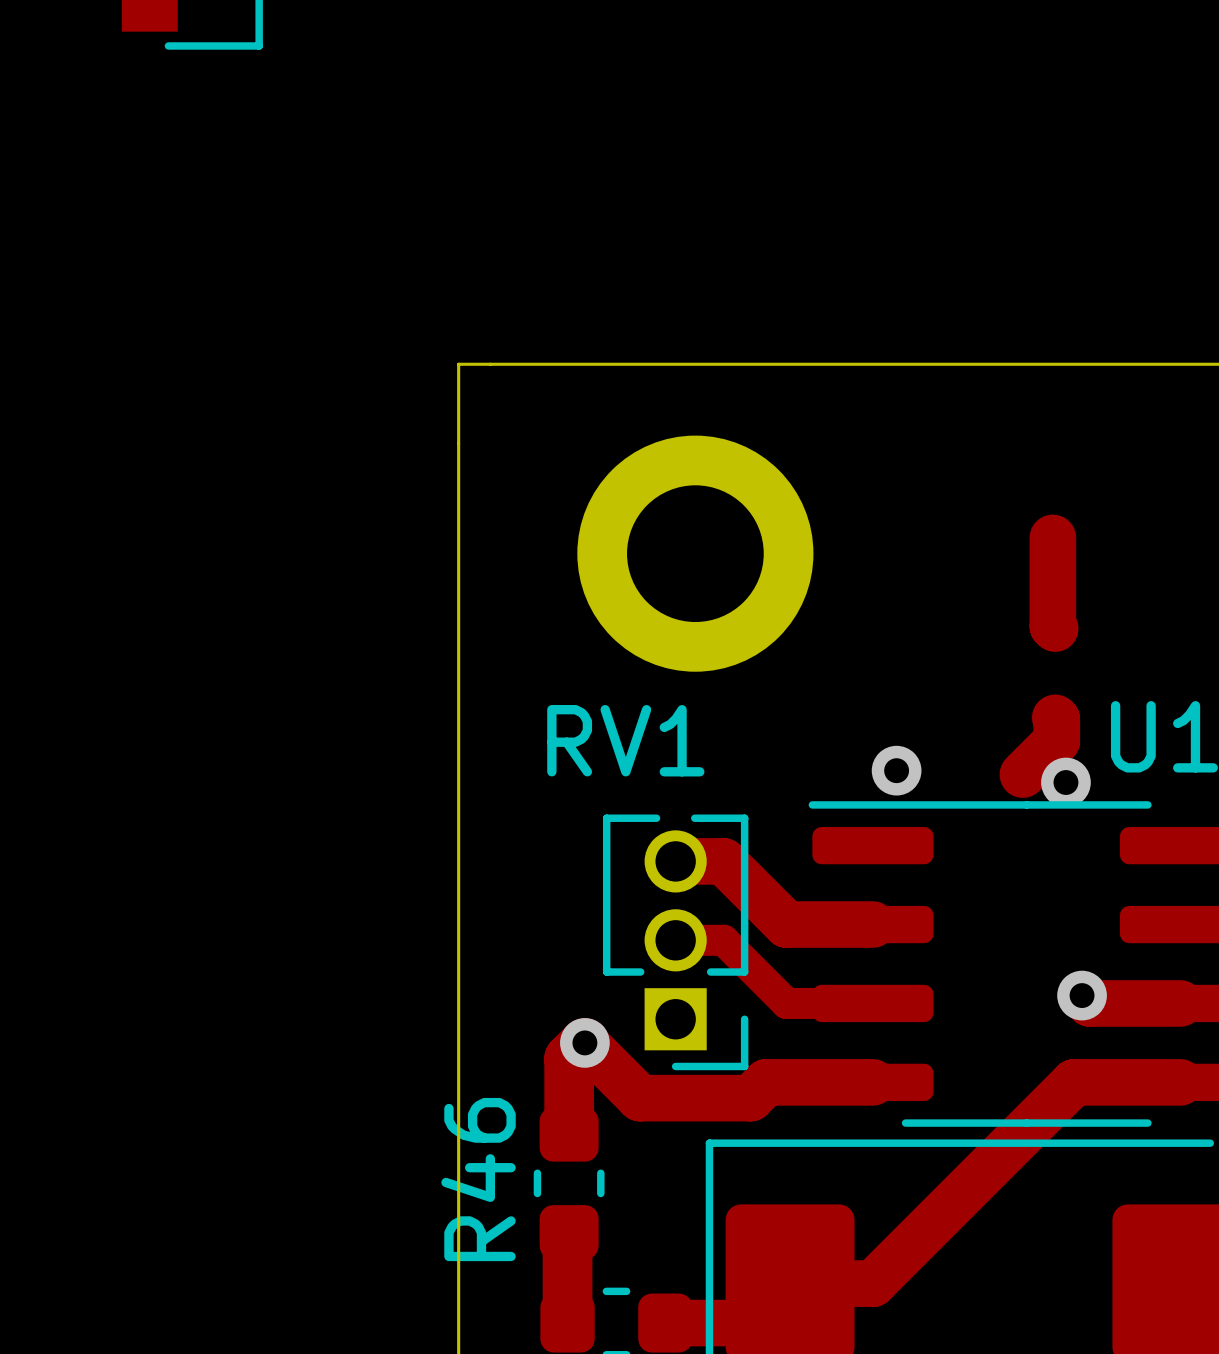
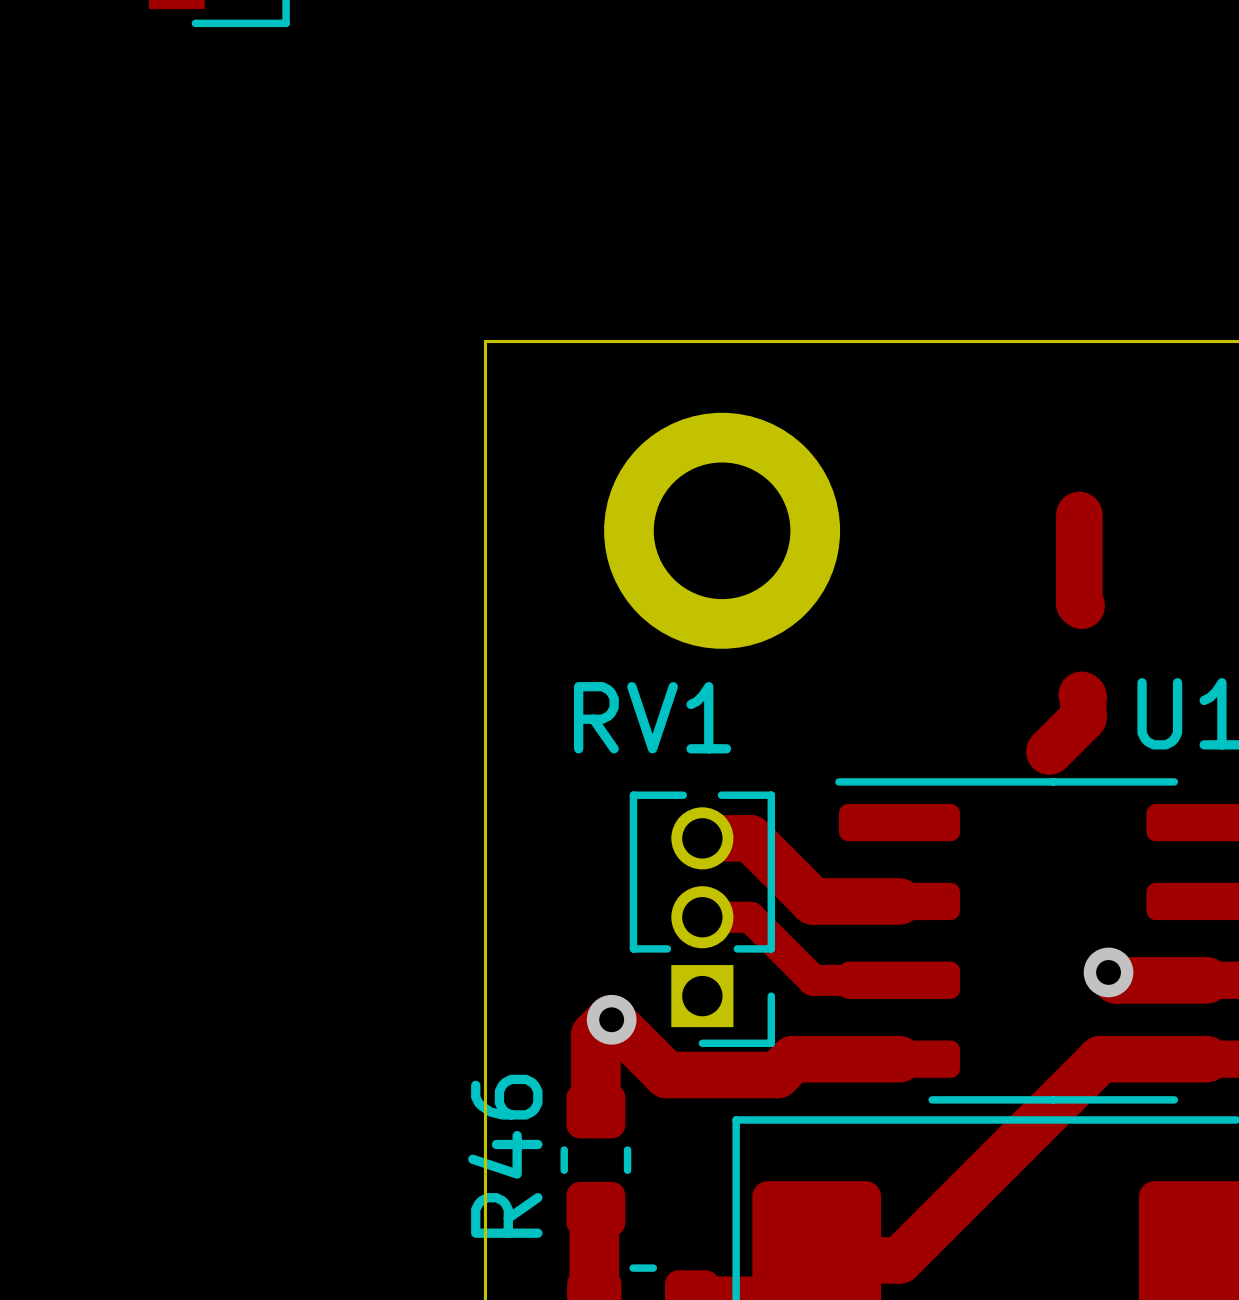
via: (896, 770) -> none
via: (1065, 782) -> none

